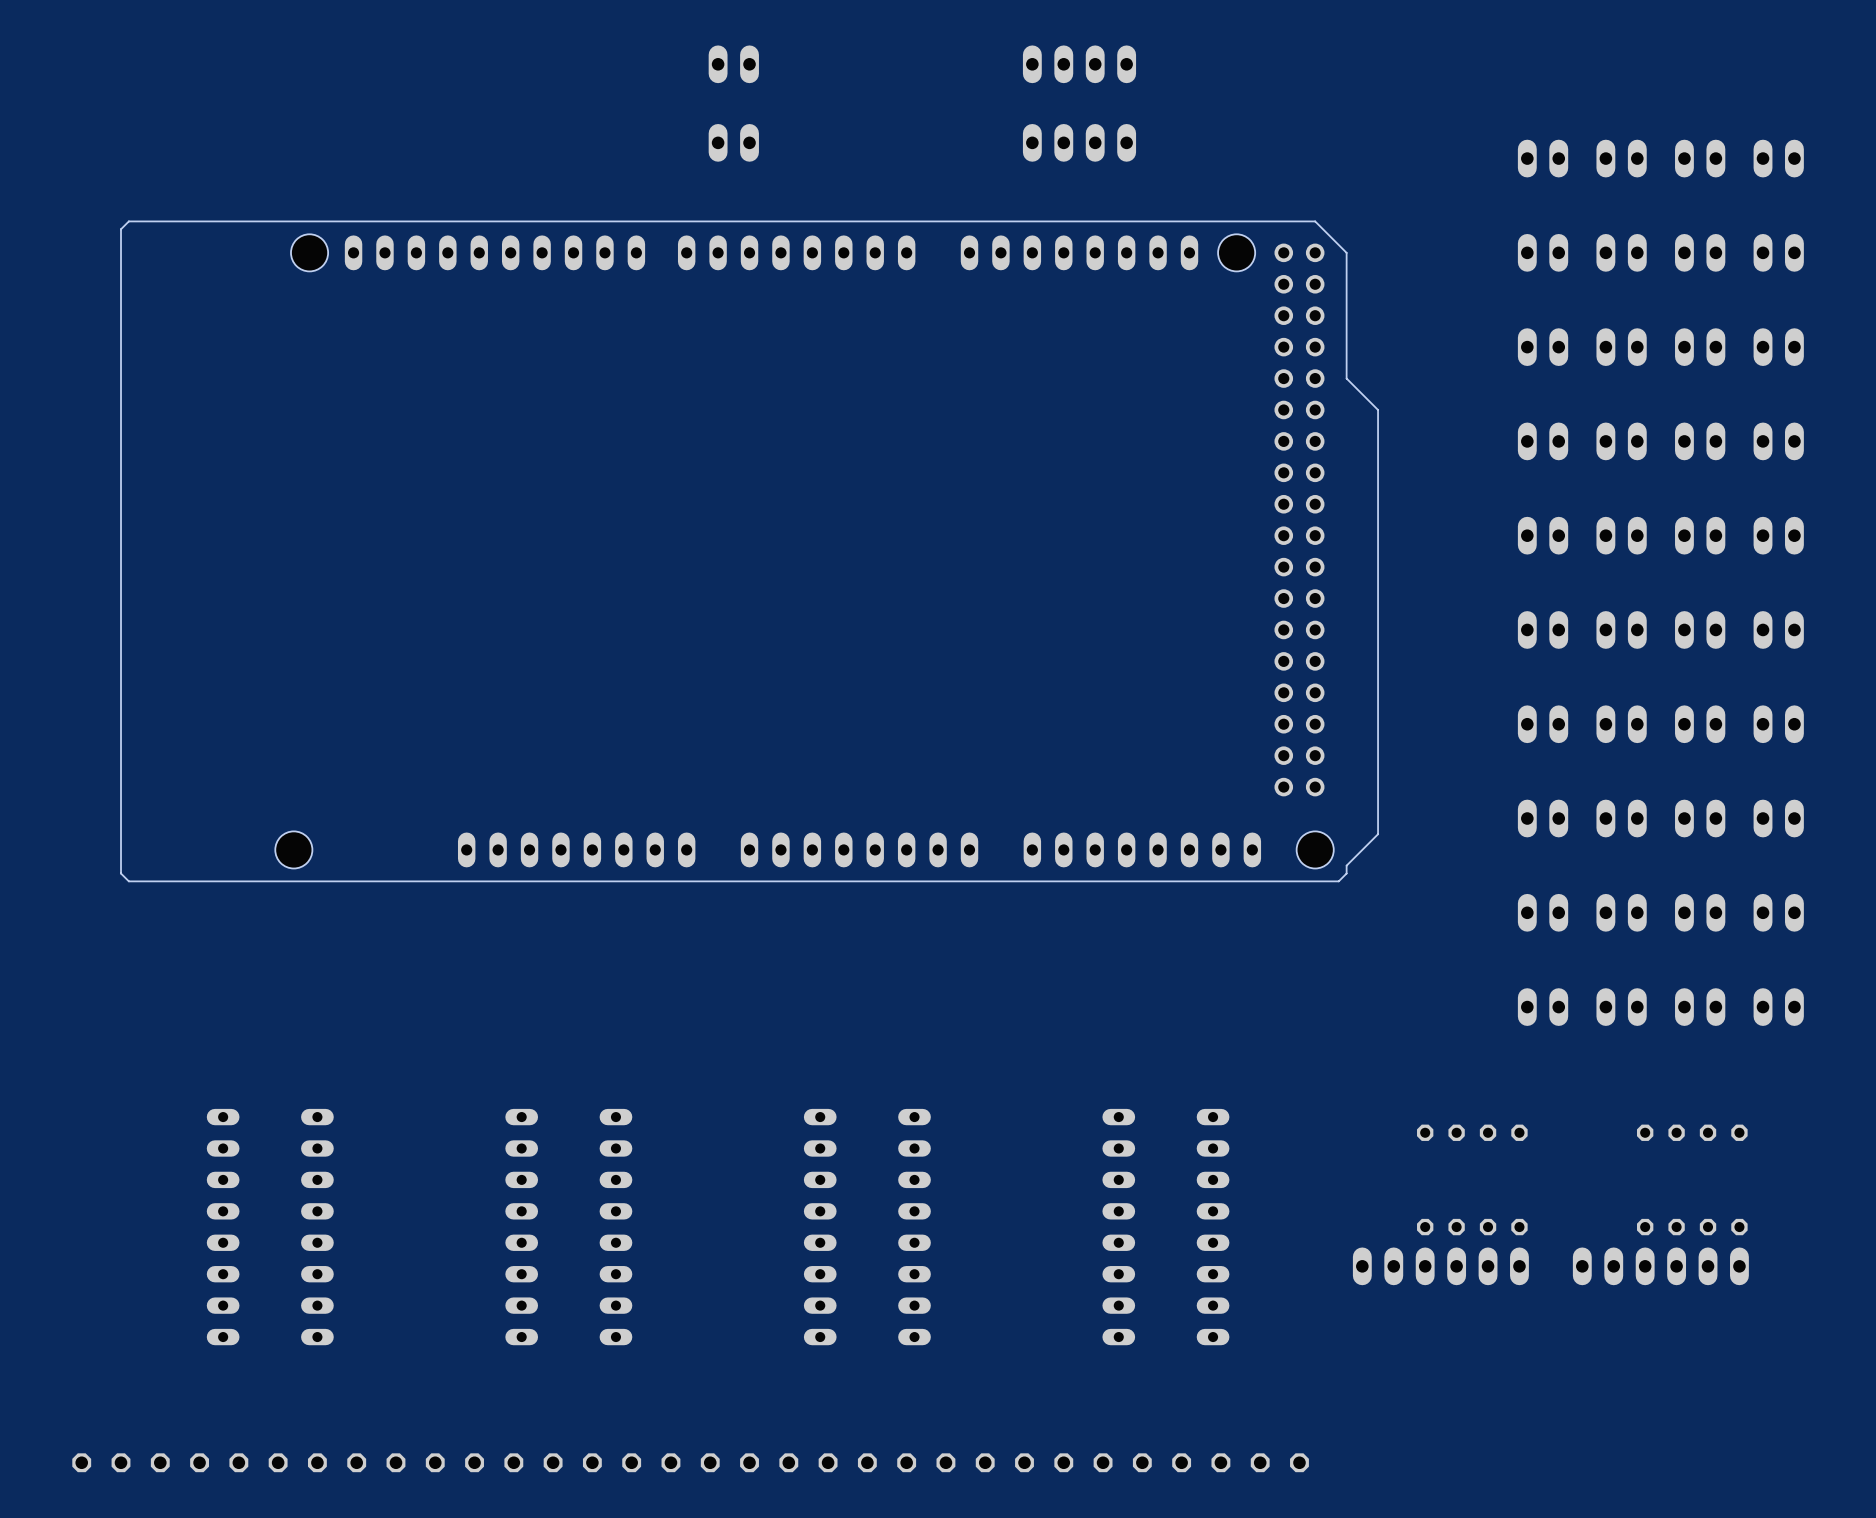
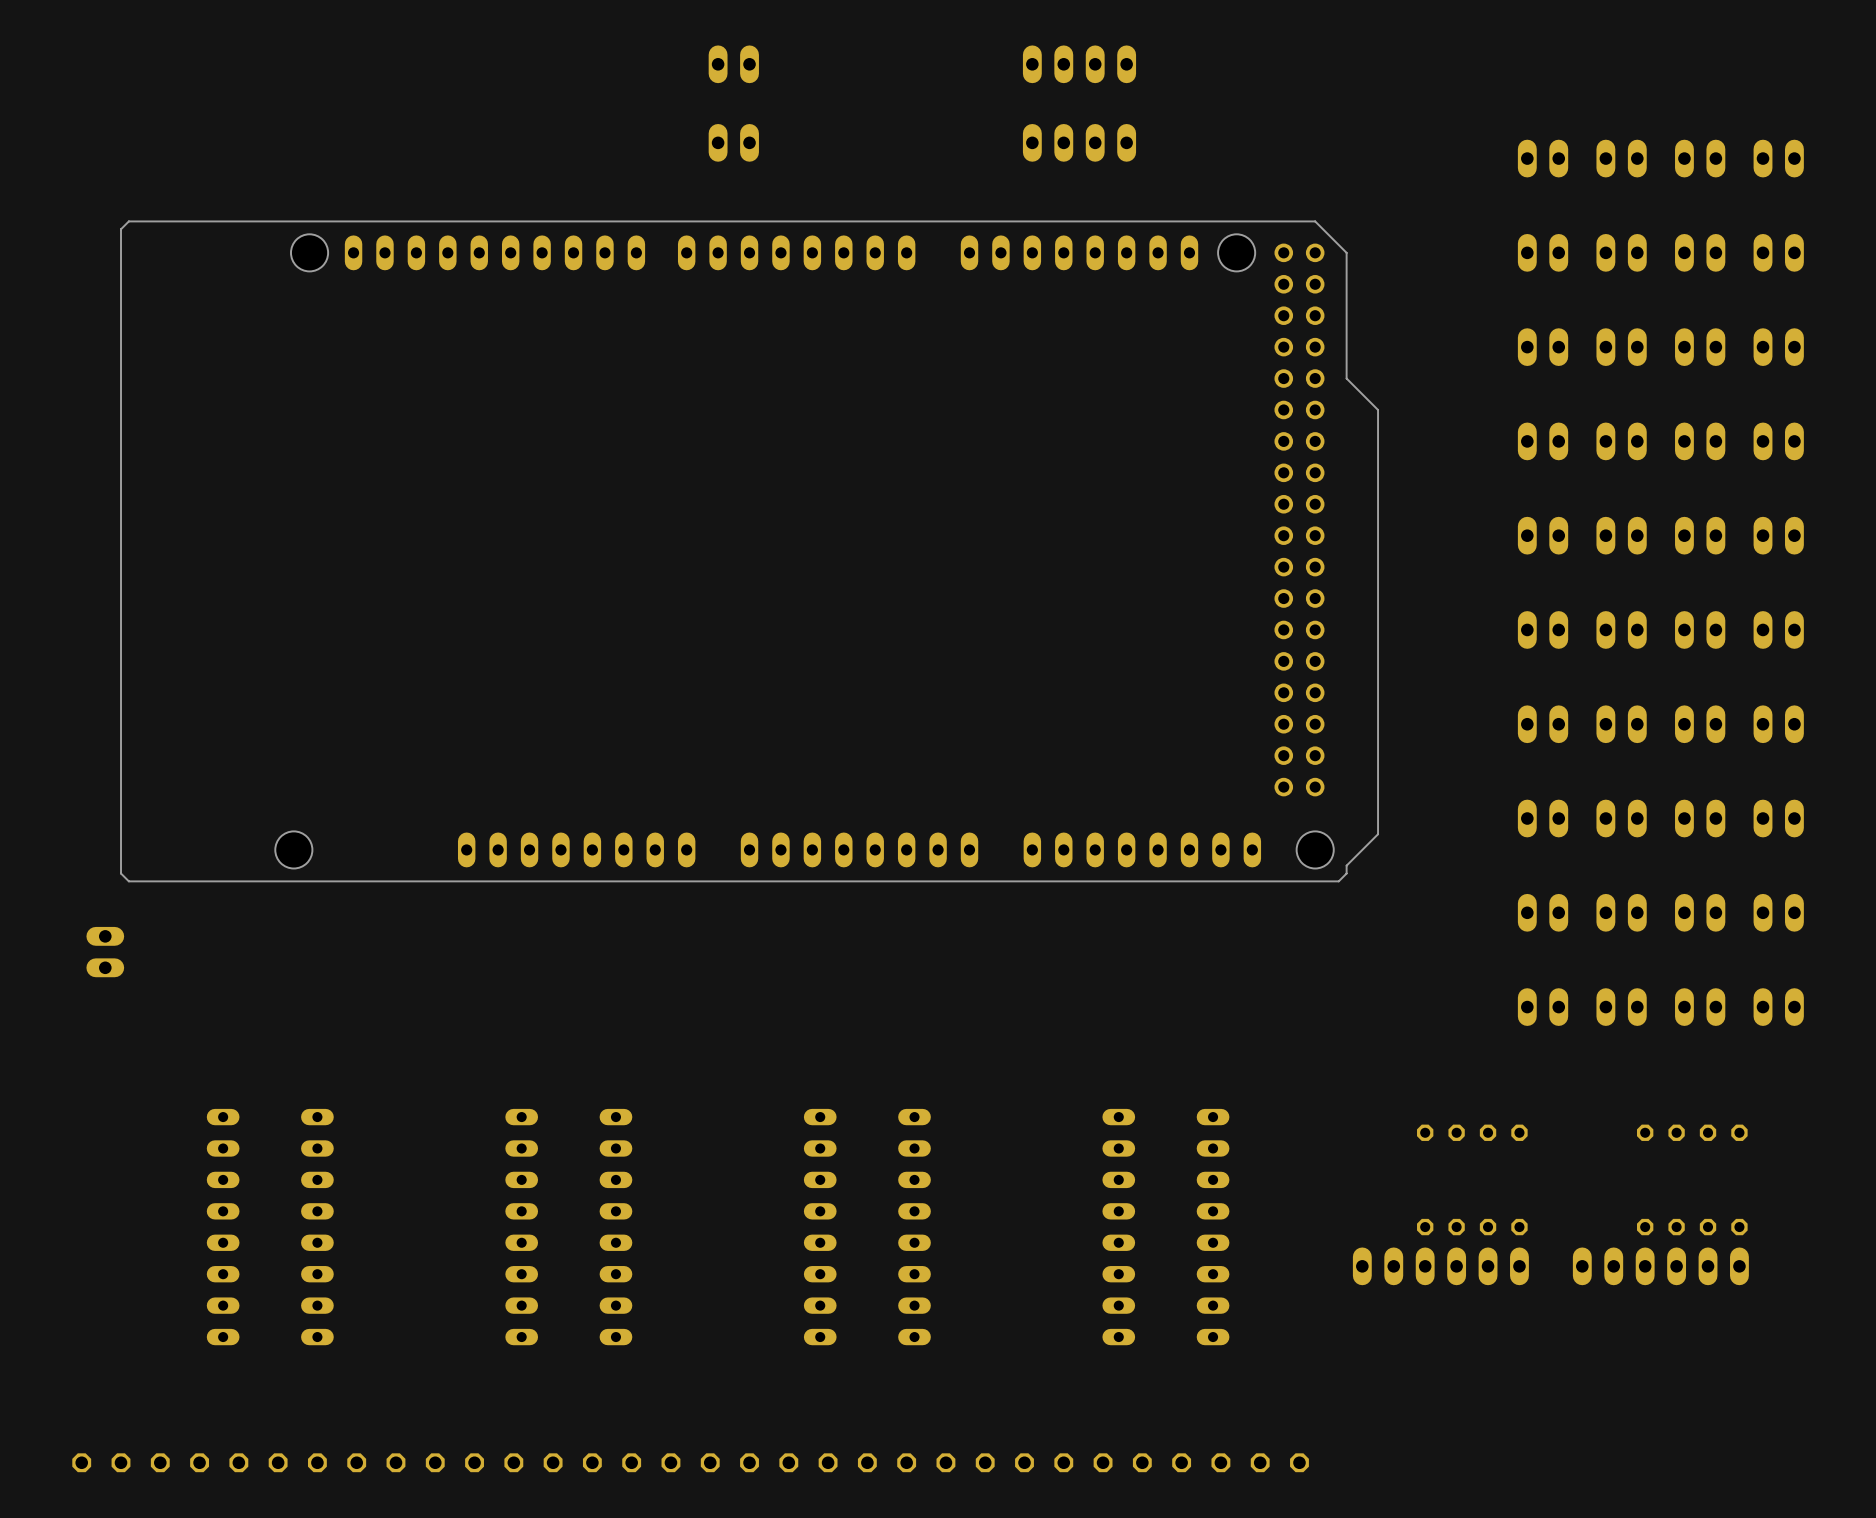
part: none -> (105, 952)

